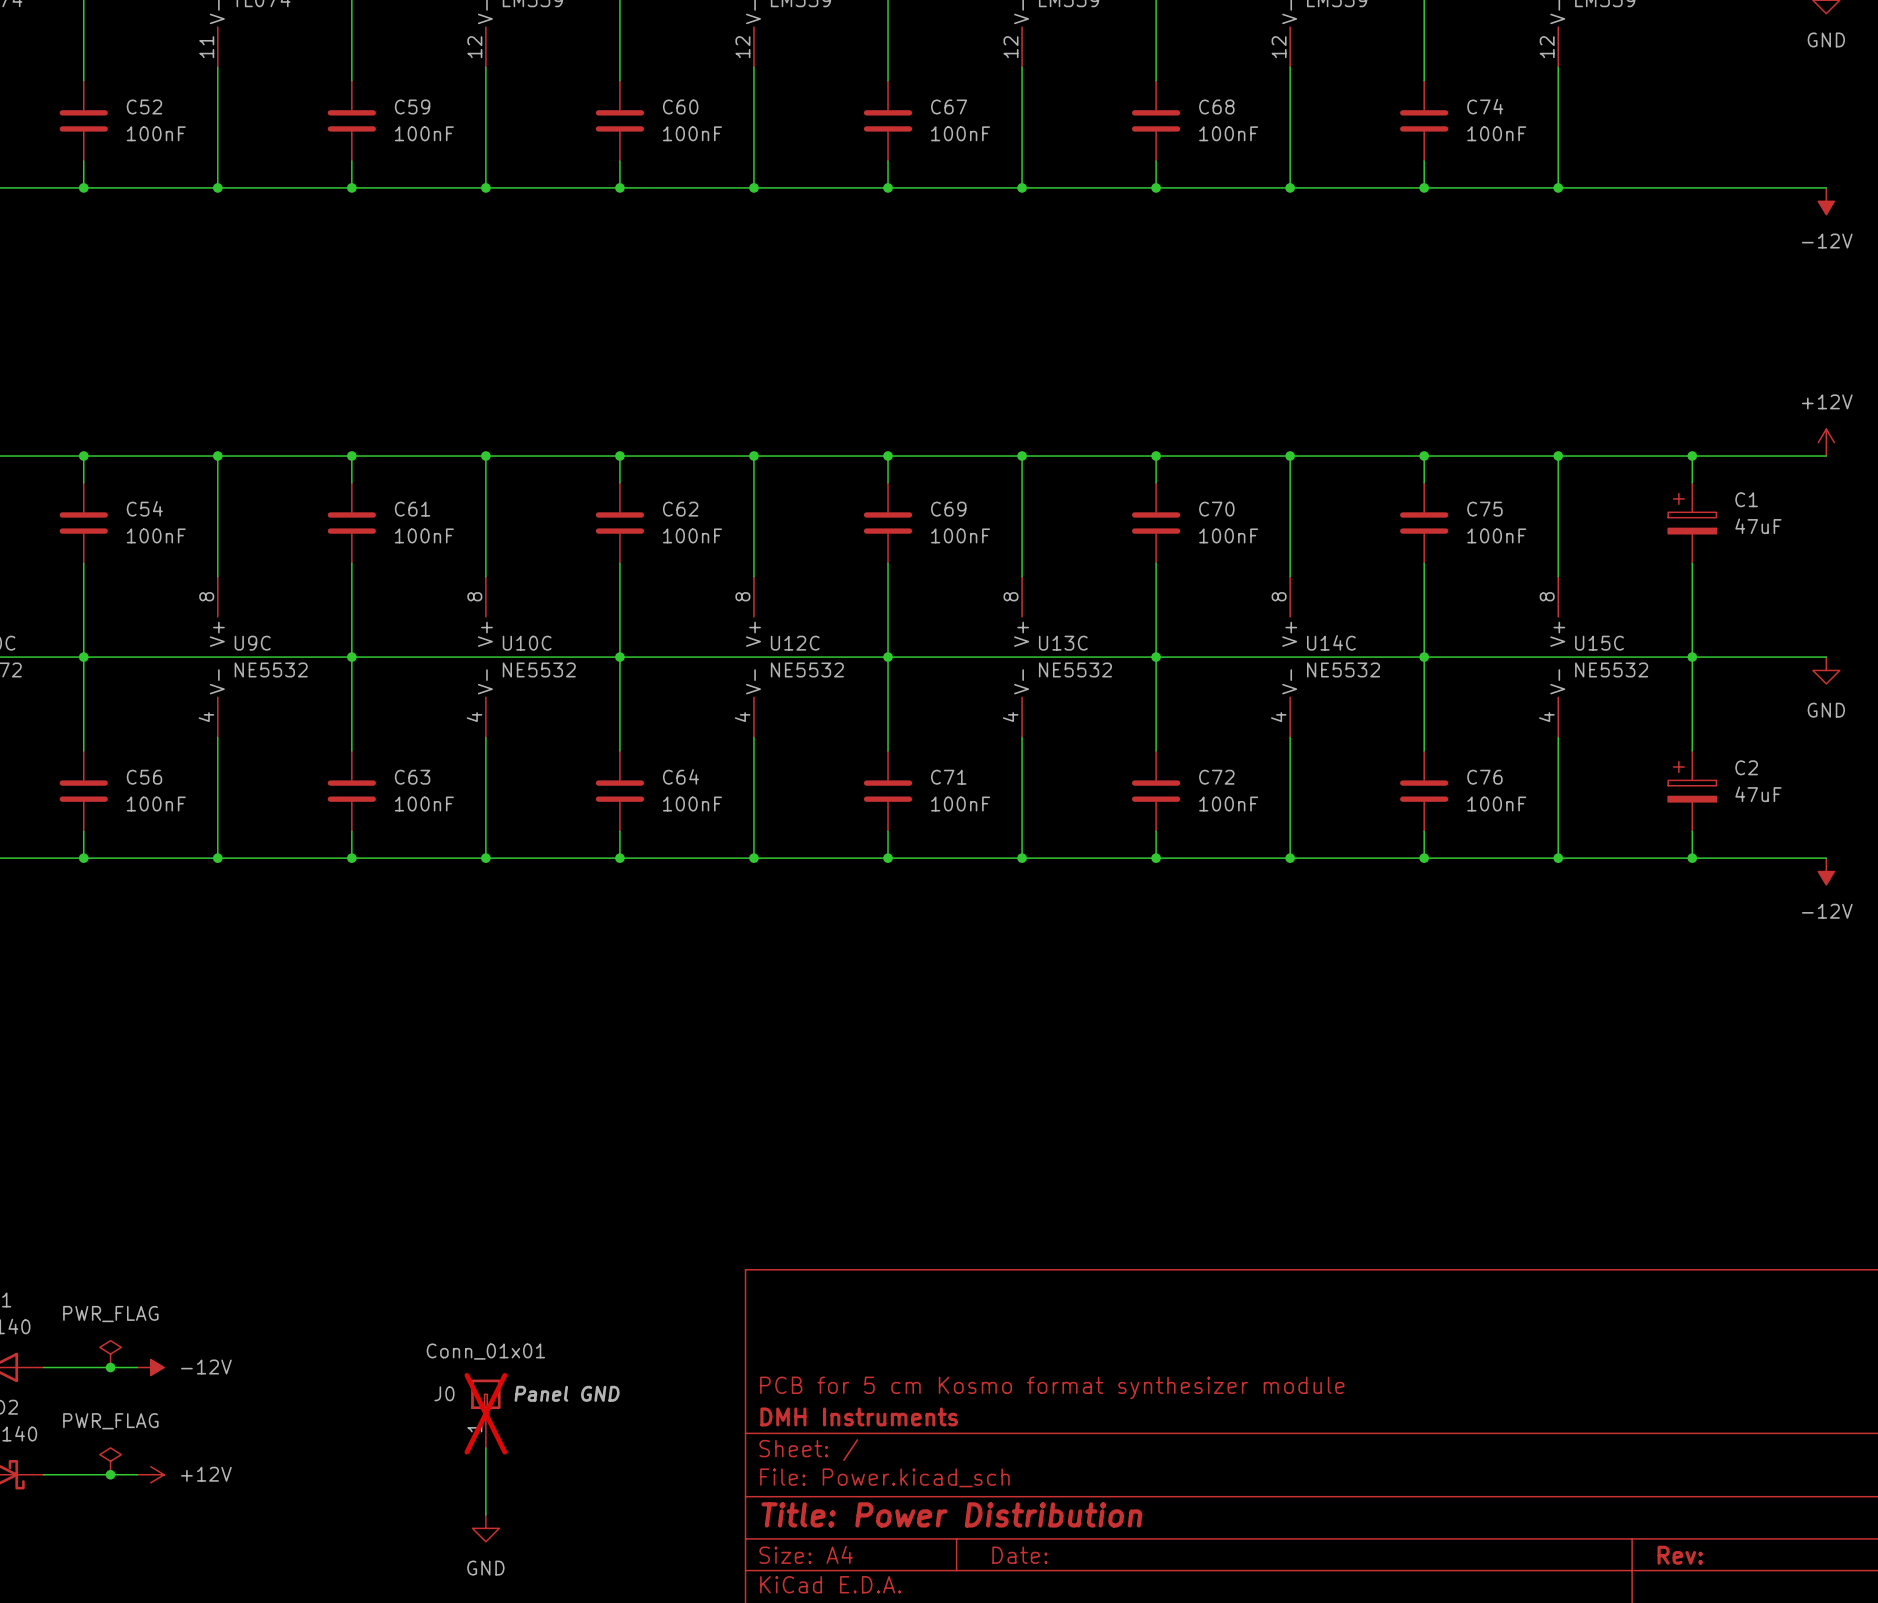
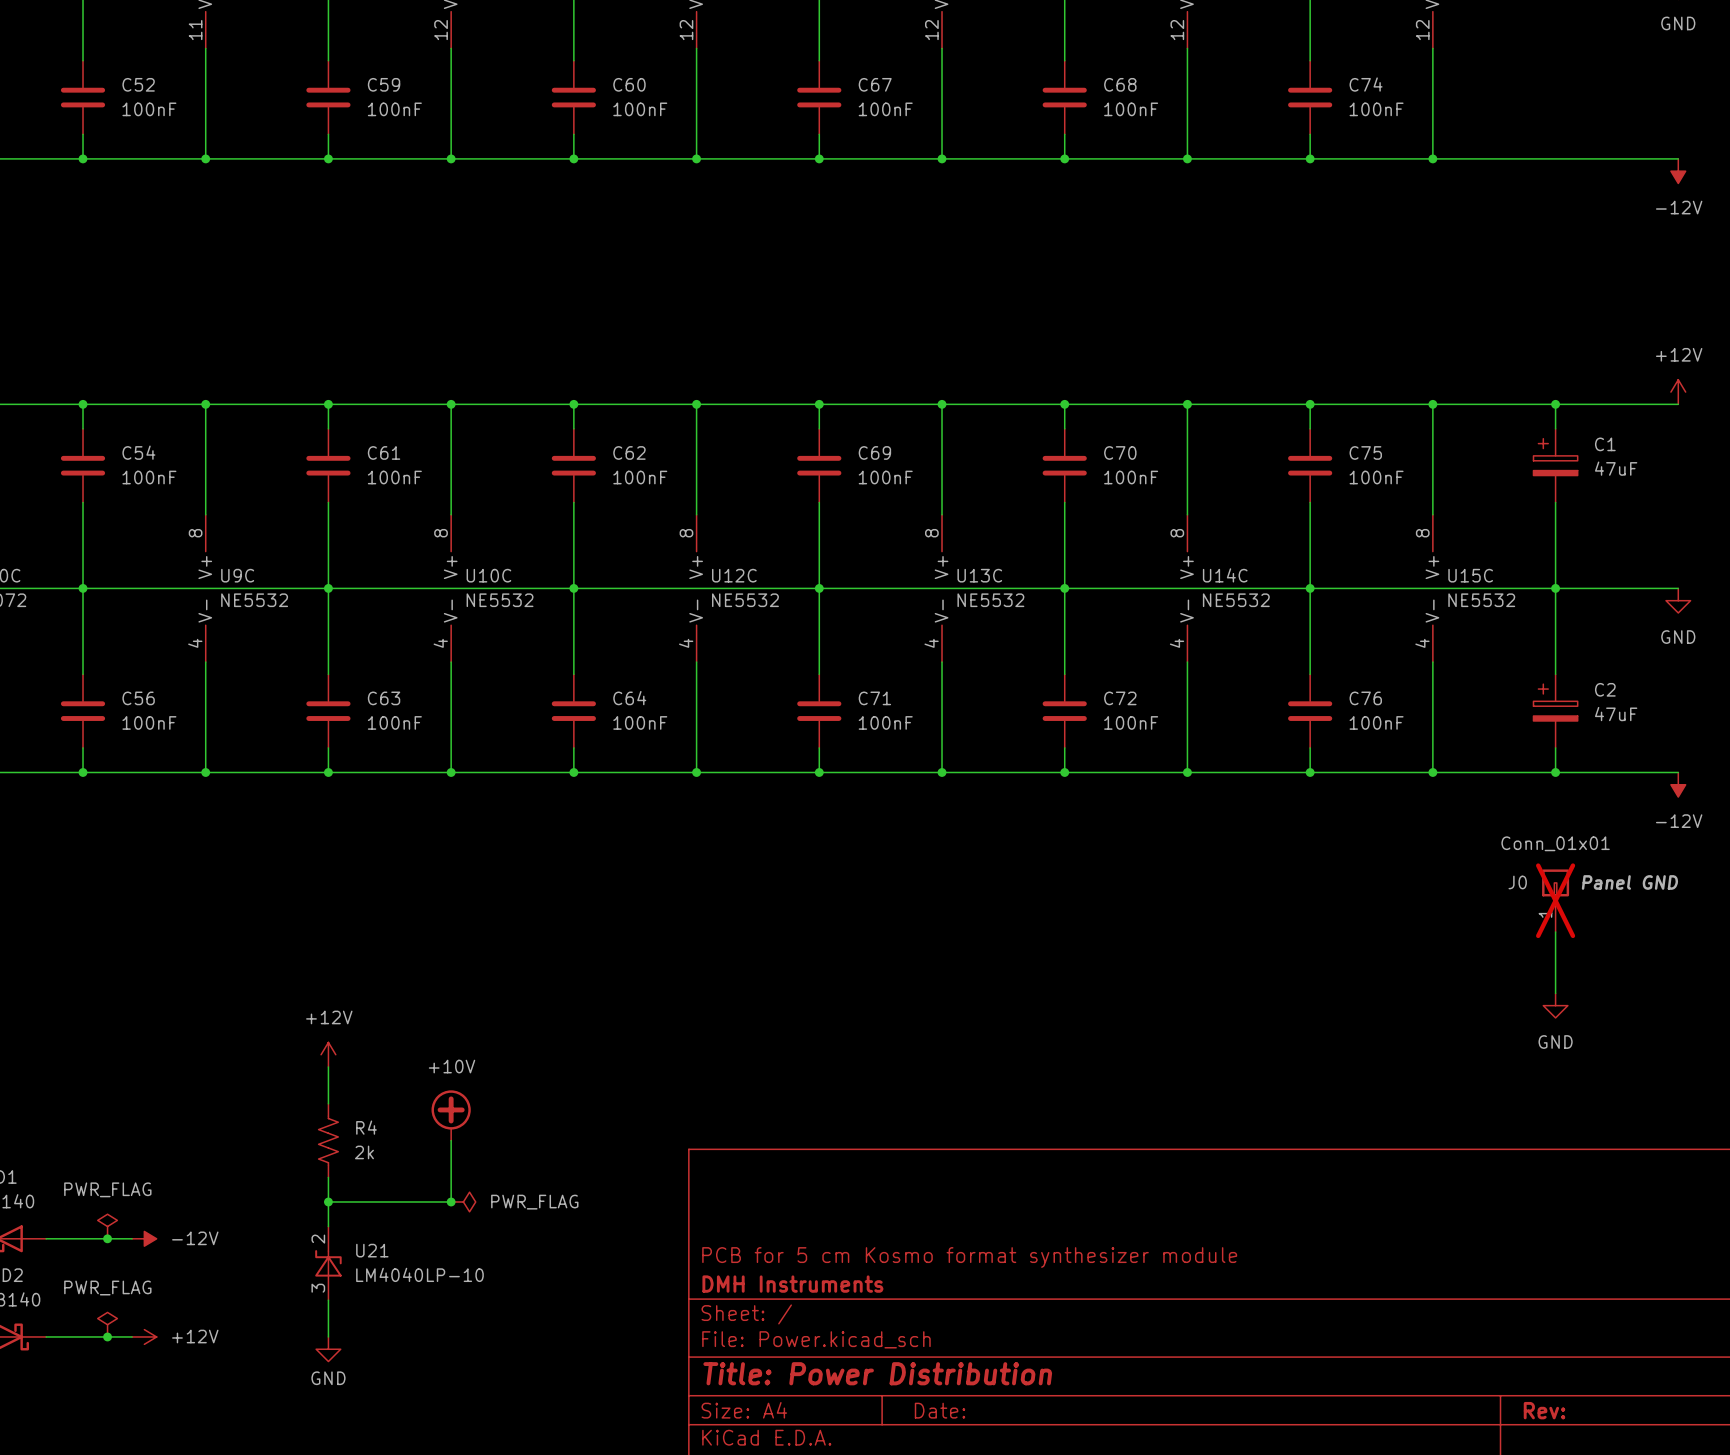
wire: none -> (1555, 932) (1555, 993)
power symbol: none -> GND (1555, 1005)
power symbol: none -> +12V (328, 1054)
wire: none -> (328, 1067) (328, 1103)
power symbol: none -> +10V (451, 1115)
R4: none -> 2k (328, 1140)
wire: none -> (451, 1140) (451, 1201) (328, 1201)
wire: none -> (328, 1177) (328, 1226)
junction: none -> (328, 1201)
junction: none -> (451, 1201)
power symbol: none -> PWR_FLAG (463, 1201)
U21: none -> LM4040LP-10 (328, 1263)
J0 position: (485, 1413) -> (1555, 900)
wire: none -> (328, 1300) (328, 1336)
wire: (485, 1447) (485, 1514) -> none
power symbol position: GND (485, 1528) -> GND (328, 1349)
power symbol text position: GND (485, 1568) -> GND (328, 1378)

